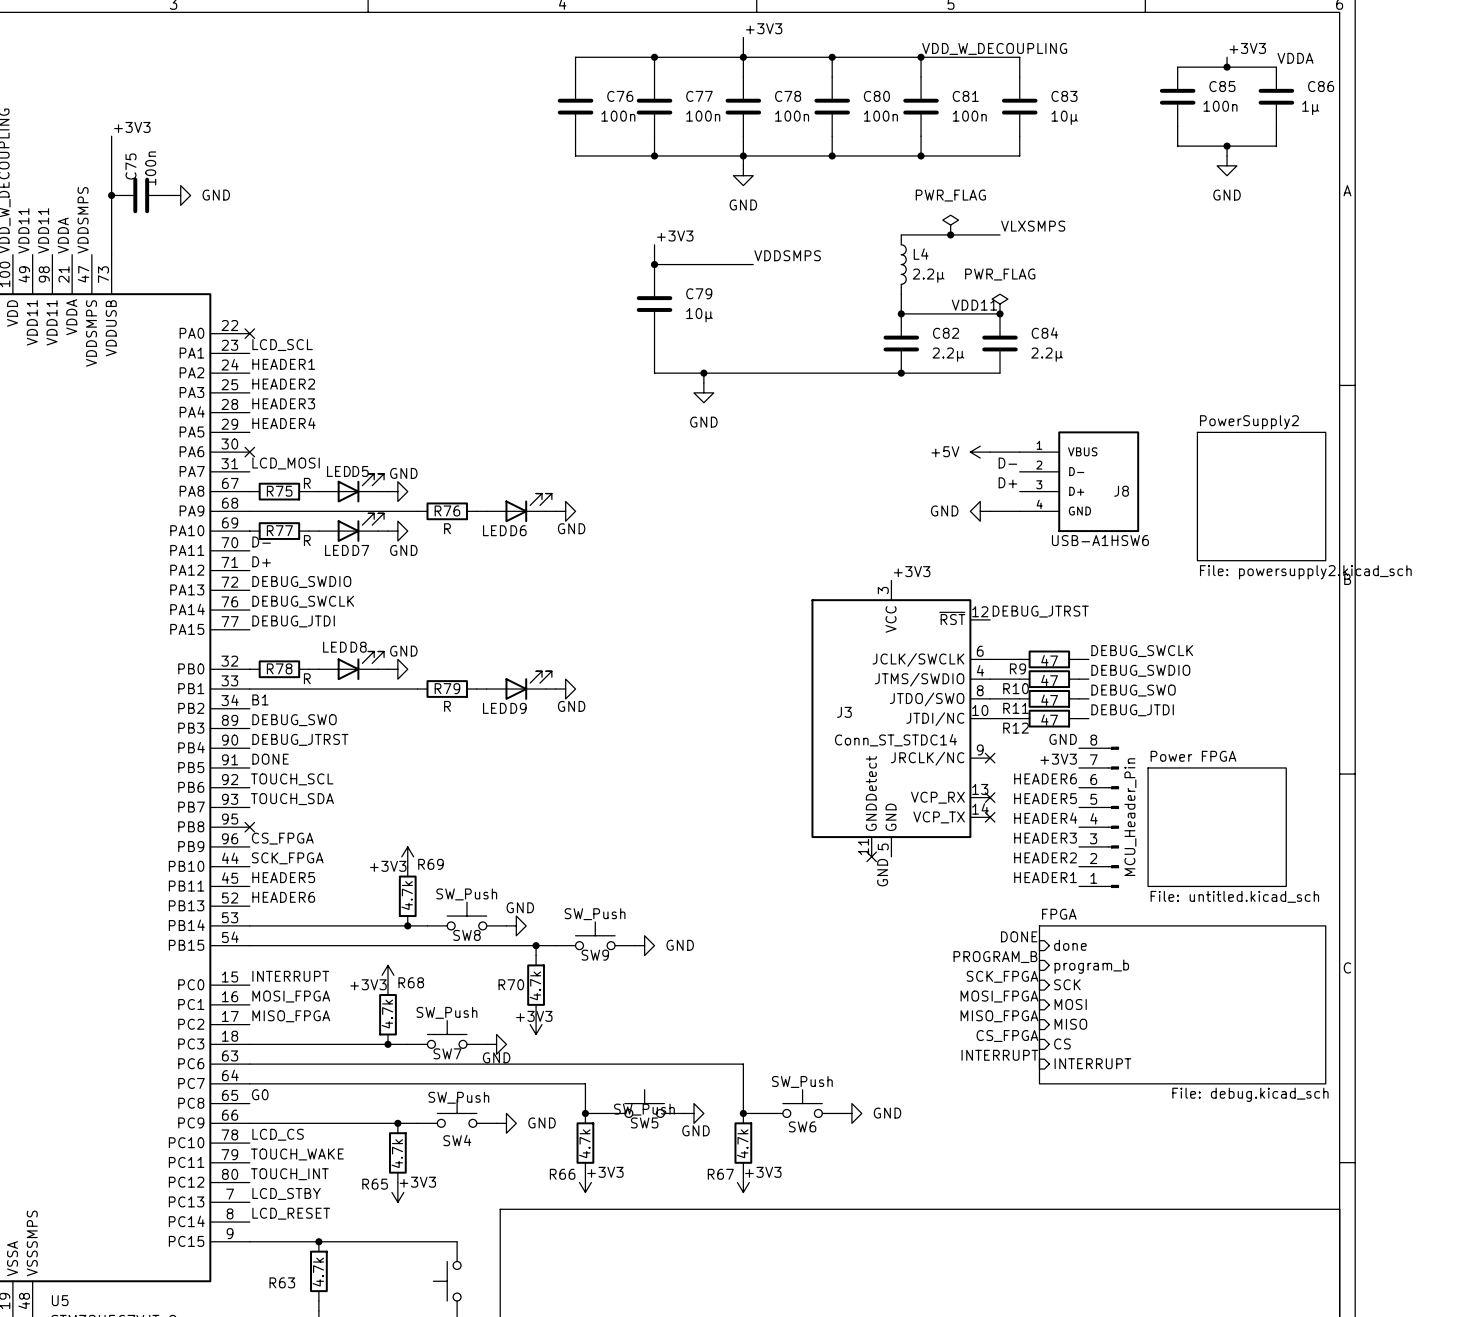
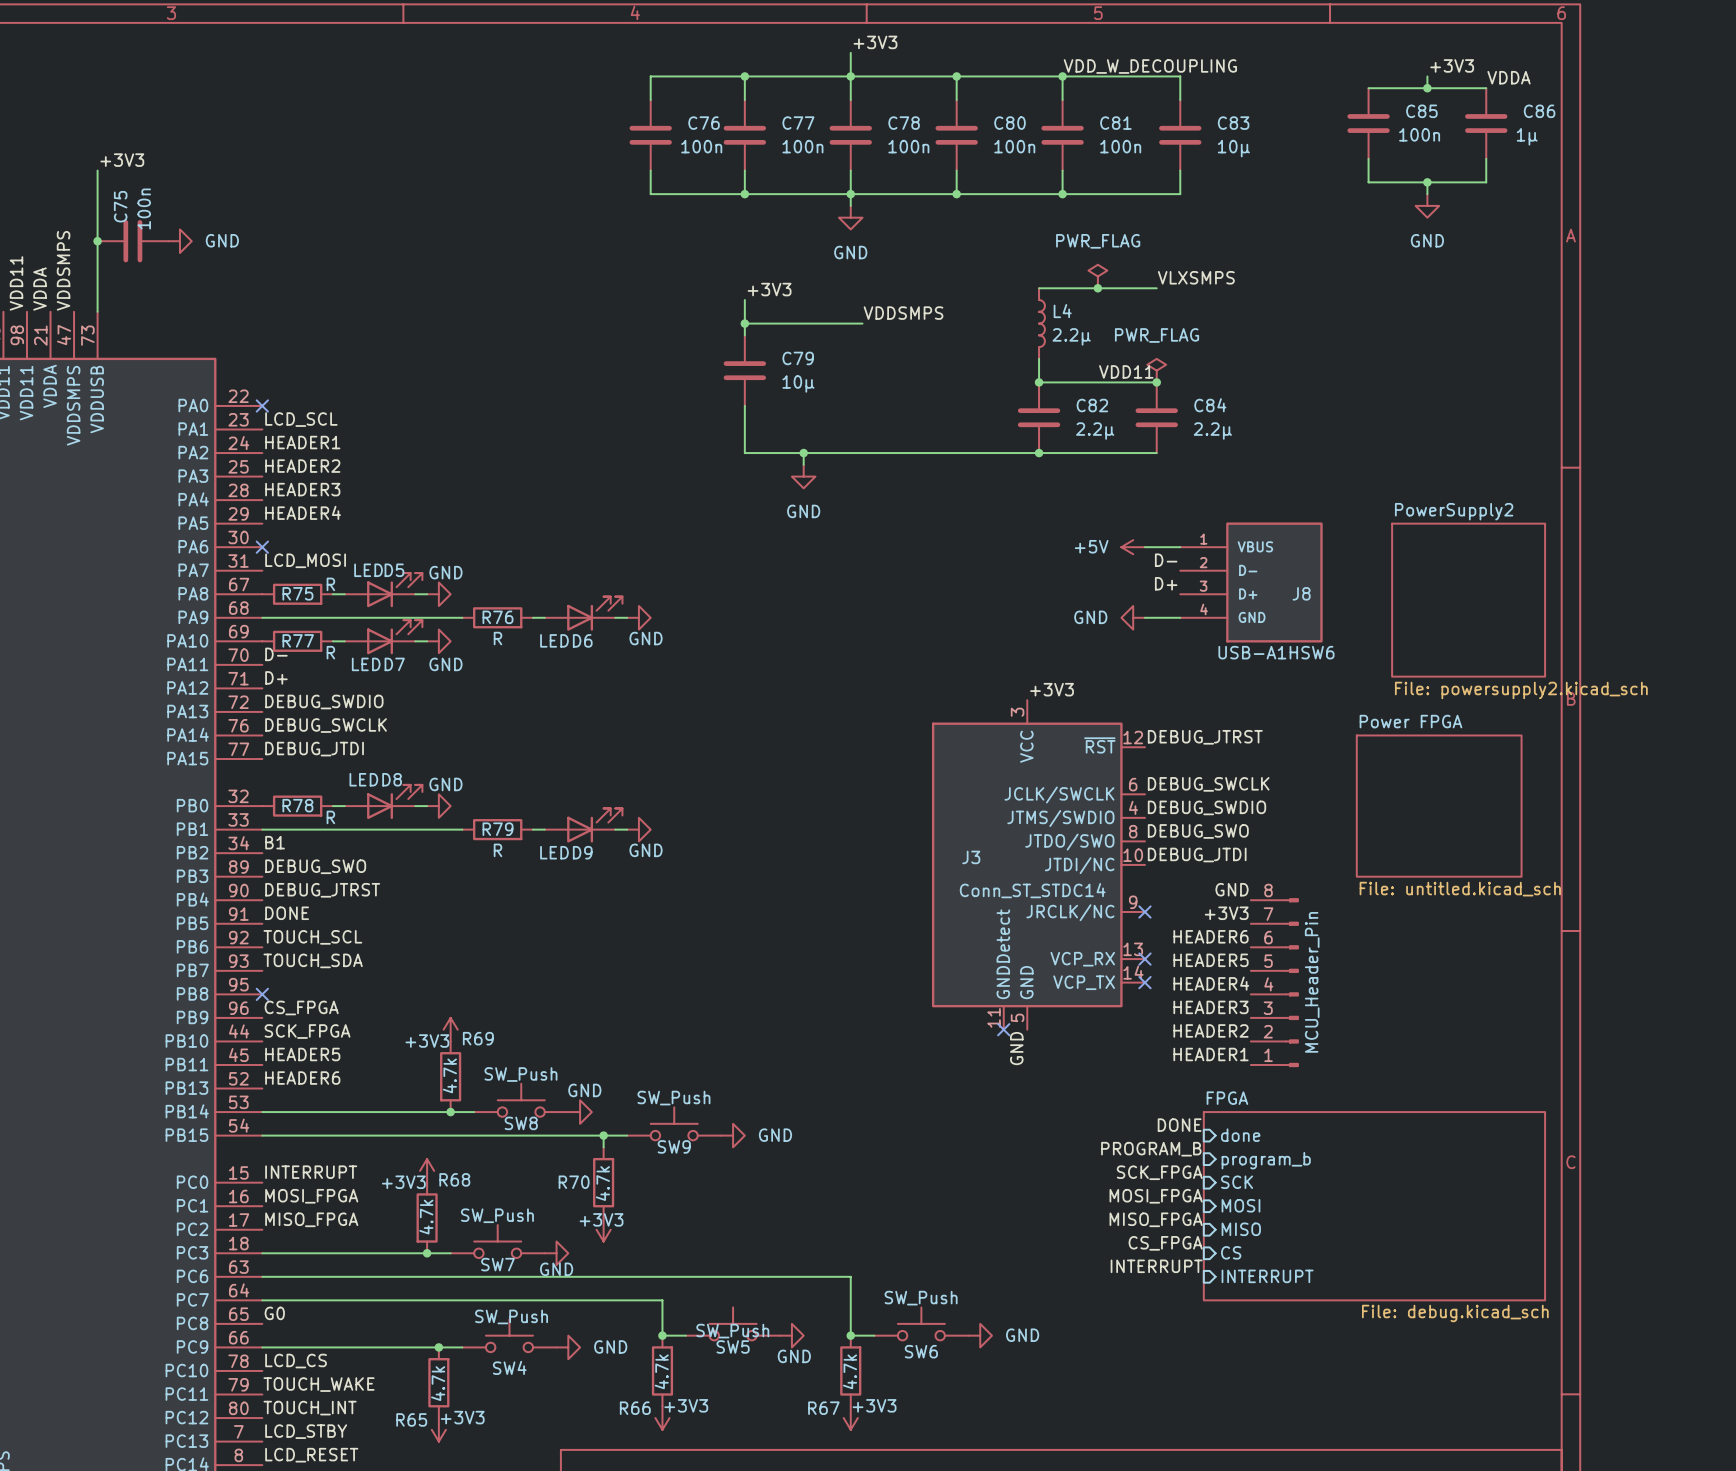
label position: DEBUG_SWCLK (1142, 651) -> DEBUG_SWCLK (1208, 784)
wire: (990, 659) (1019, 659) -> none
R9: 47 (1049, 659) -> none
wire: (1078, 659) (1088, 659) -> none
label position: DEBUG_SWDIO (1140, 670) -> DEBUG_SWDIO (1206, 807)
wire: (990, 679) (1019, 679) -> none
R10: 47 (1049, 679) -> none
wire: (1078, 679) (1088, 679) -> none
label position: DEBUG_SWO (1133, 690) -> DEBUG_SWO (1198, 831)
wire: (990, 698) (1019, 698) -> none
R11: 47 (1049, 698) -> none
wire: (1078, 698) (1088, 698) -> none
label position: DEBUG_JTDI (1132, 710) -> DEBUG_JTDI (1197, 854)
wire: (990, 718) (1019, 718) -> none
R12: 47 (1049, 718) -> none
wire: (1078, 718) (1088, 718) -> none
sheet Power FPGA position: (1217, 827) -> (1439, 806)

